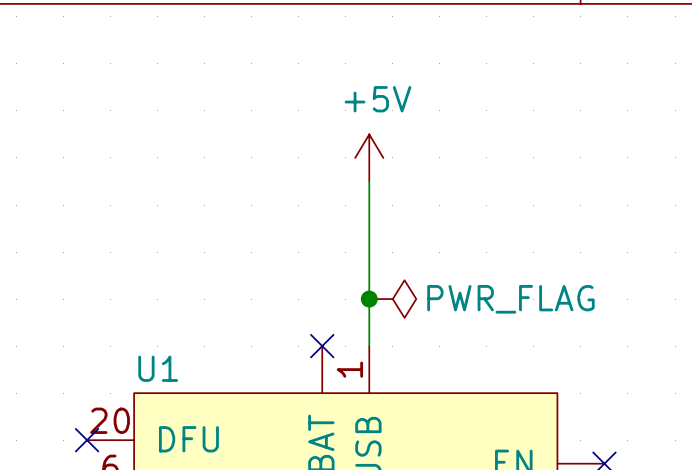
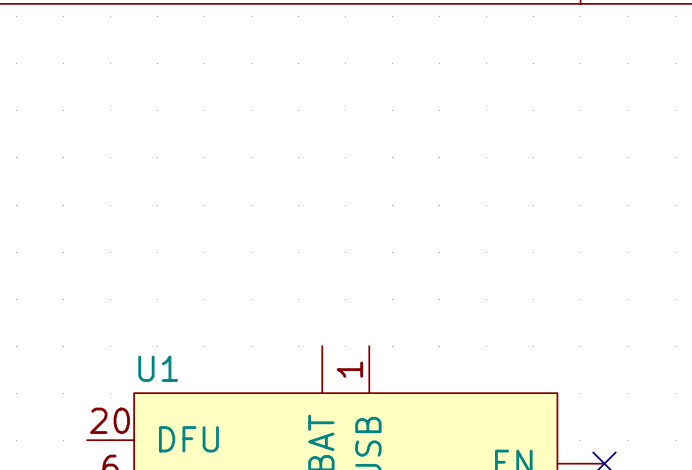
power symbol: +5V (369, 157) -> none
wire: (369, 181) (369, 346) -> none
junction: (369, 299) -> none
power symbol: PWR_FLAG (392, 299) -> none
no-connect mark: (322, 346) -> none
no-connect mark: (87, 440) -> none

